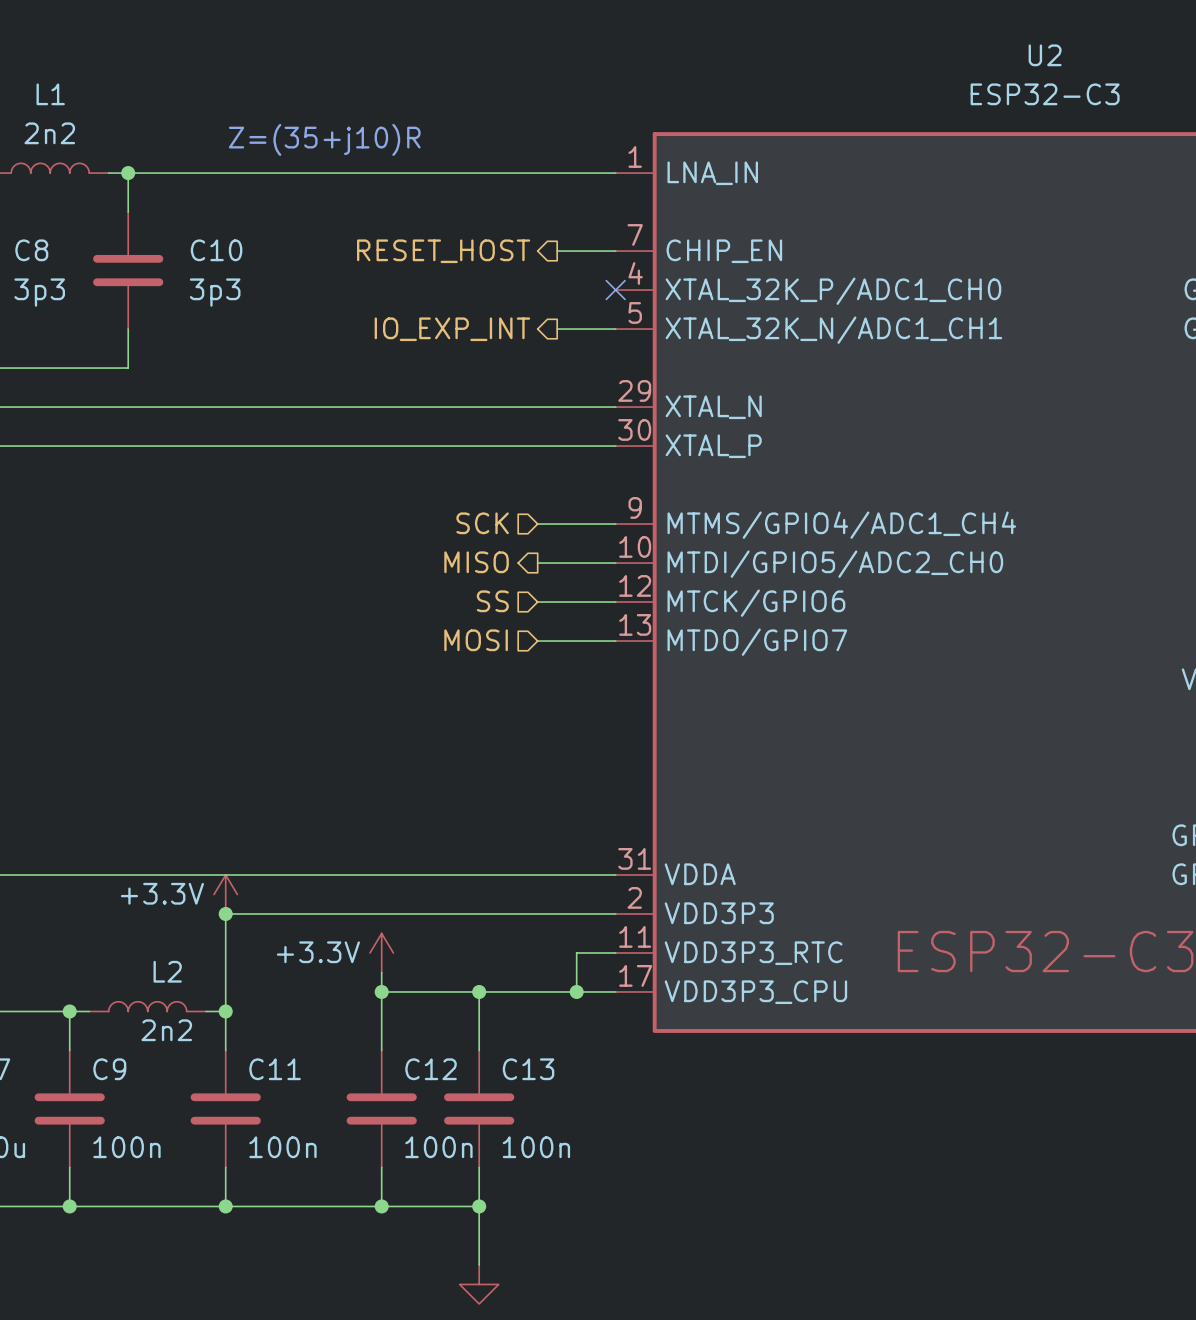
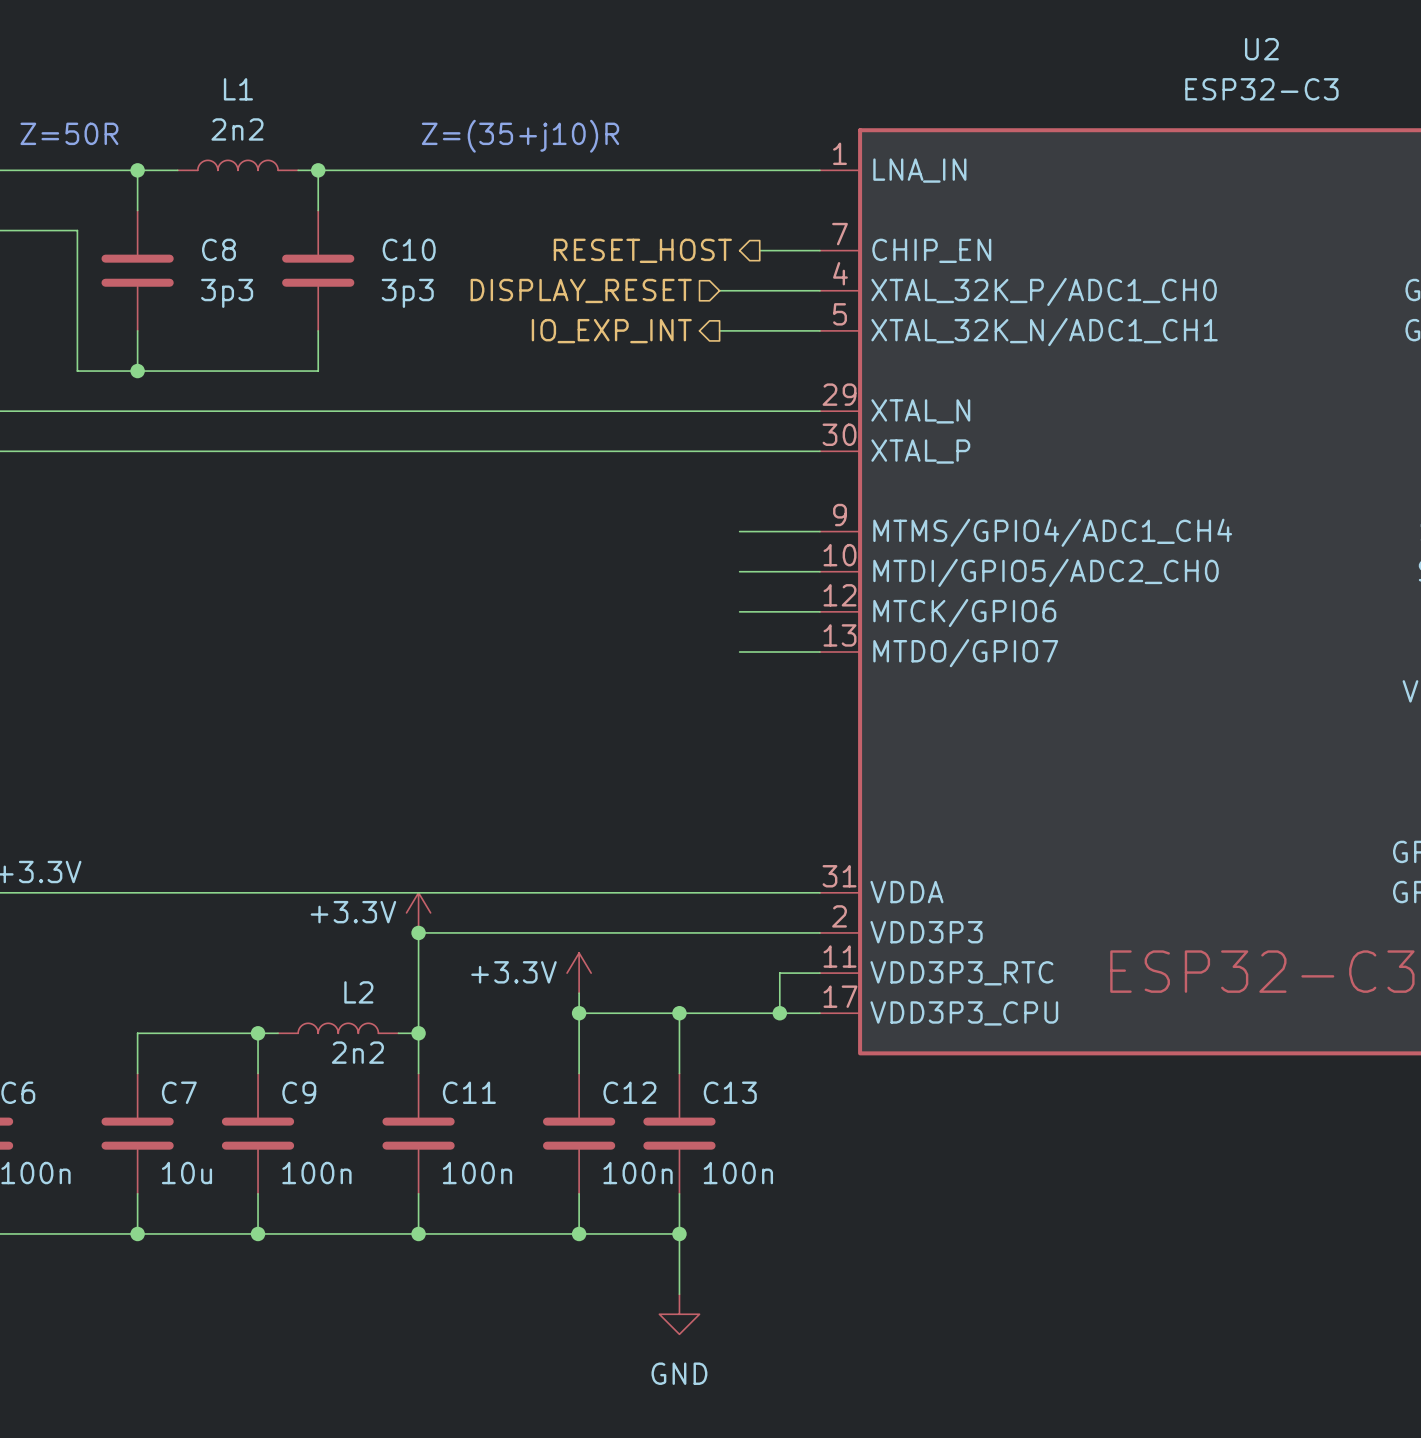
hierarchical label: none -> DISPLAY_RESET (581, 290)
wire: none -> (719, 290) (819, 290)
no-connect mark: (615, 290) -> none
hierarchical label position: IO_EXP_INT (452, 329) -> IO_EXP_INT (611, 331)
wire: none -> (719, 330) (759, 330)
hierarchical label: SCK (482, 523) -> none
hierarchical label: MISO (476, 562) -> none
hierarchical label: SS (492, 601) -> none
hierarchical label: MOSI (476, 640) -> none

